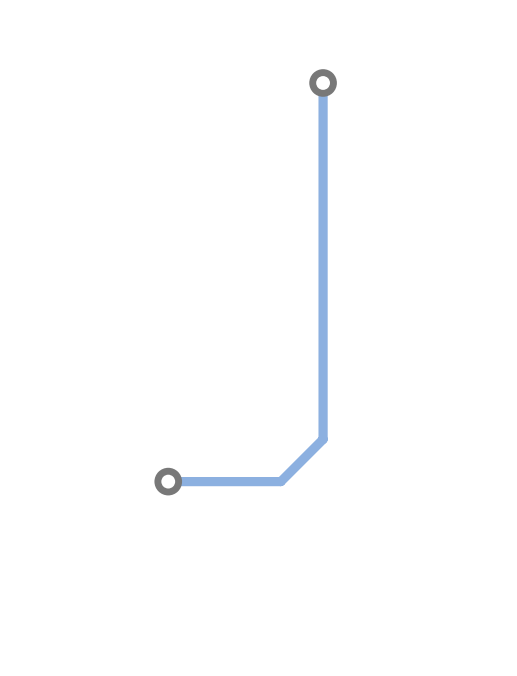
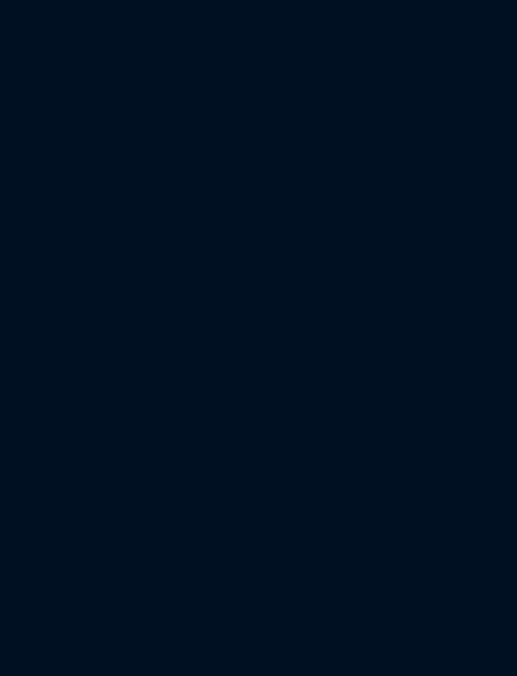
track: (323, 82) (323, 439) (280, 481) (168, 481) -> none
via: (323, 82) -> none
via: (168, 481) -> none

